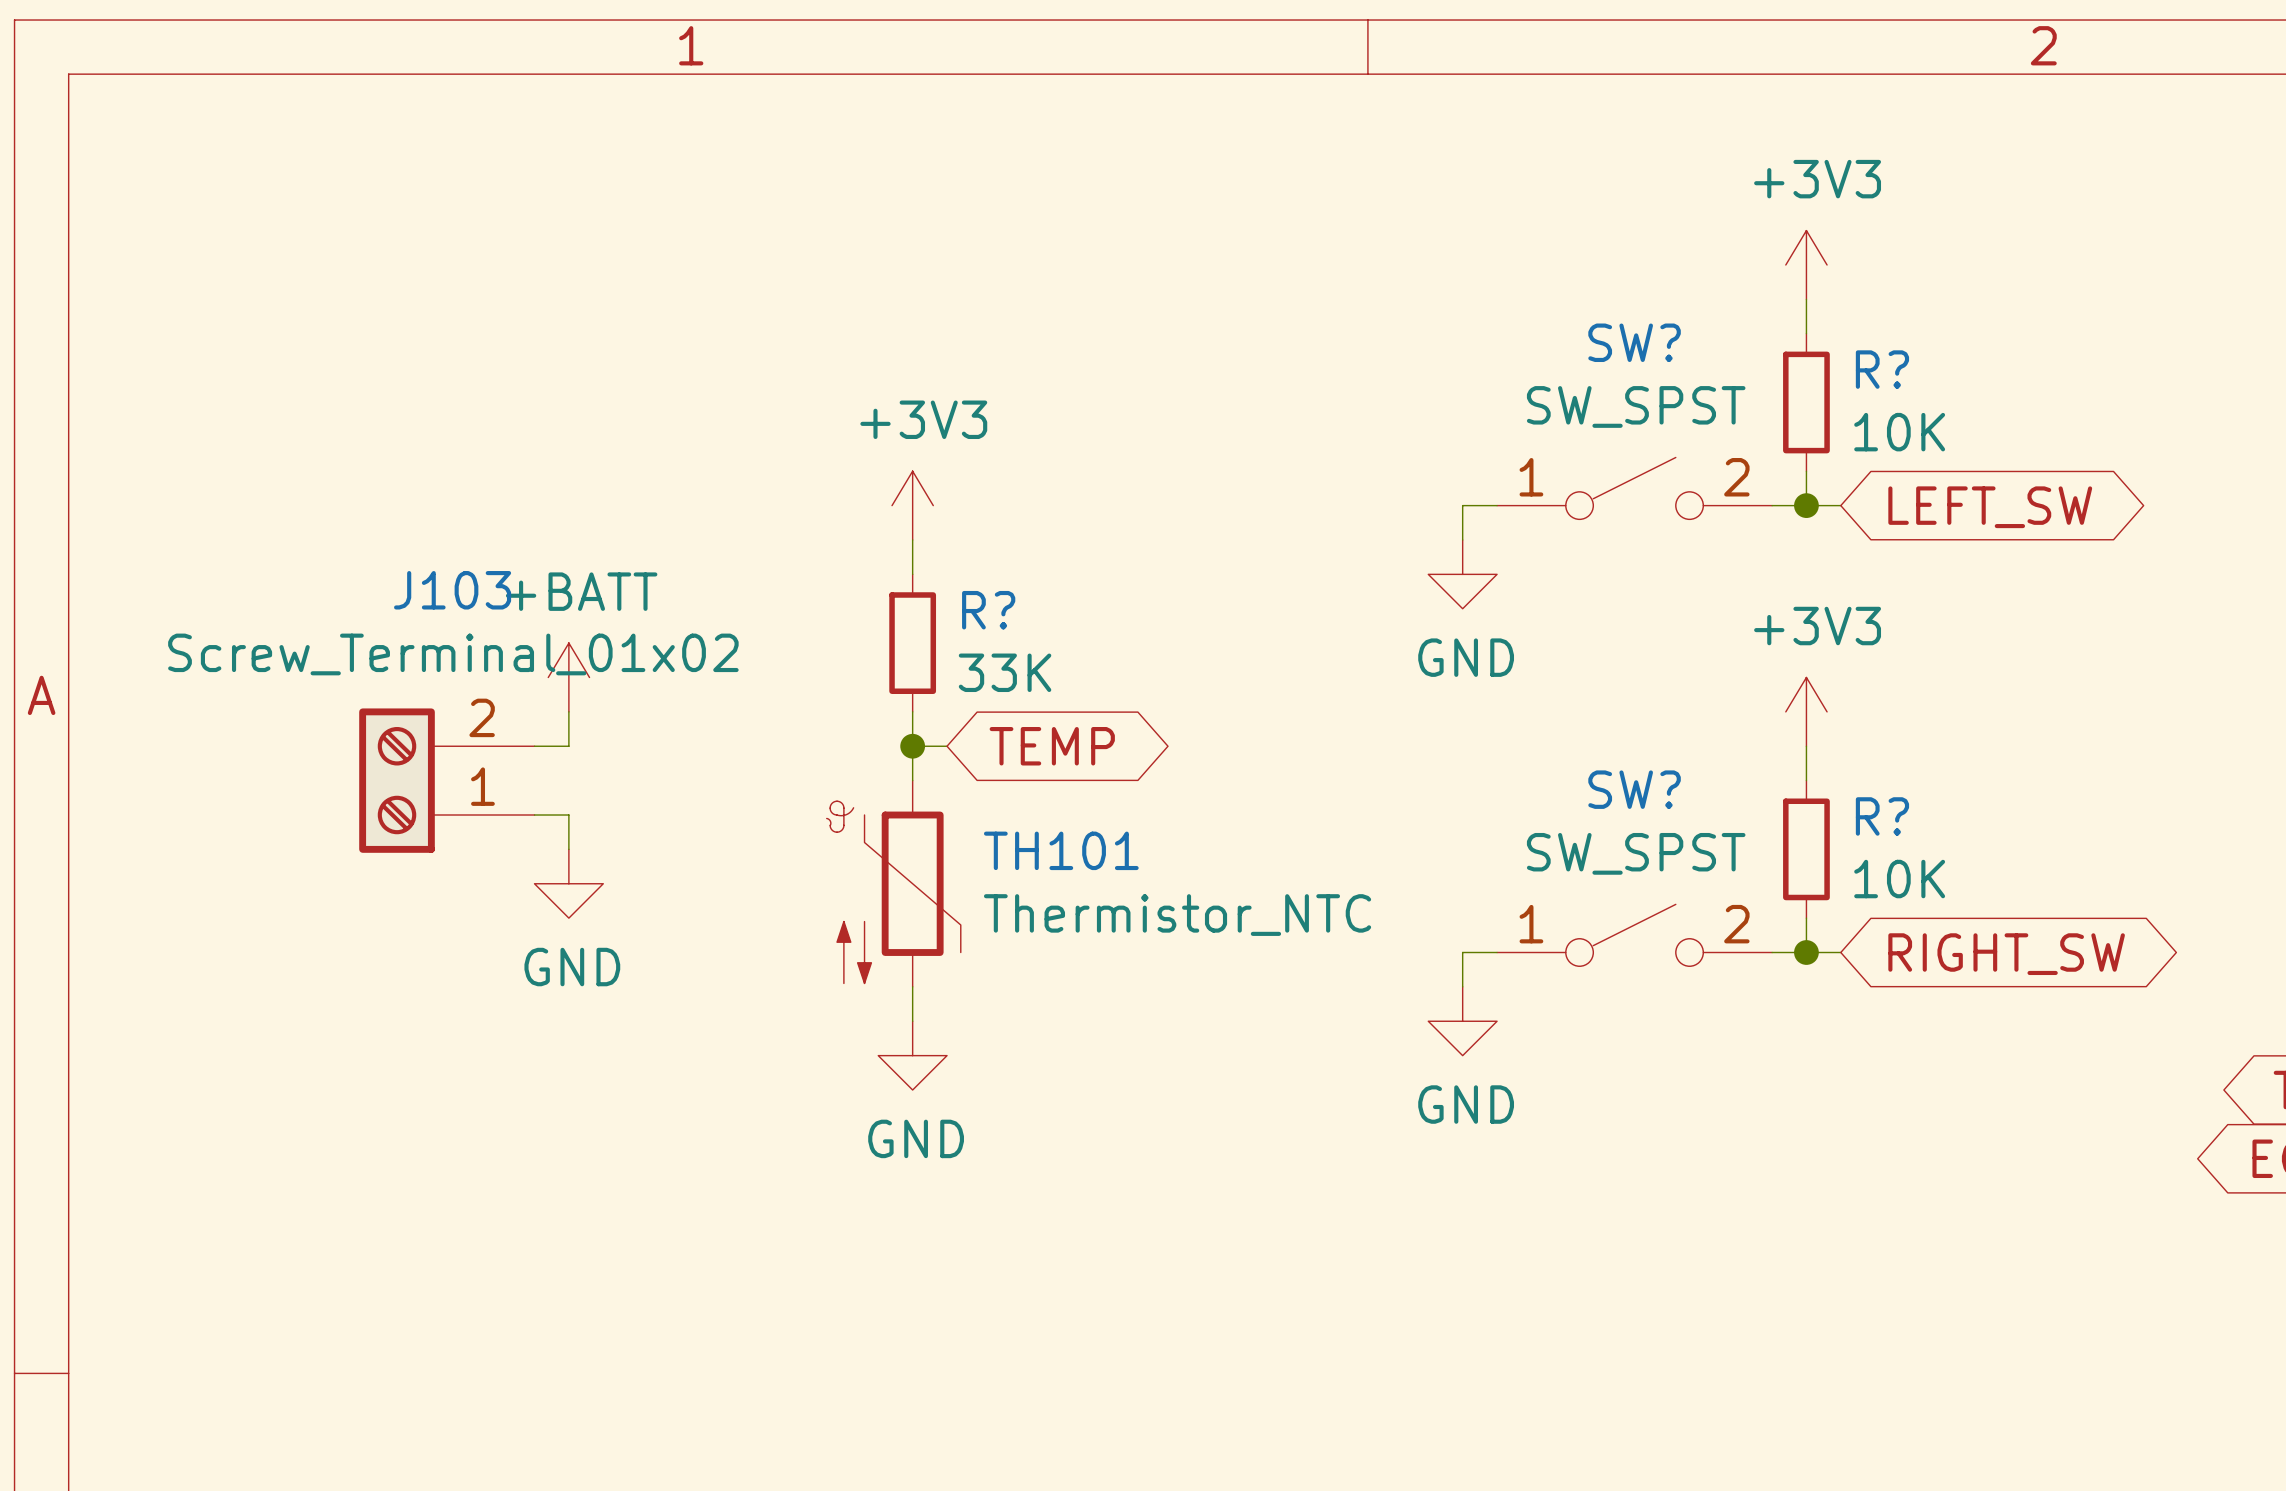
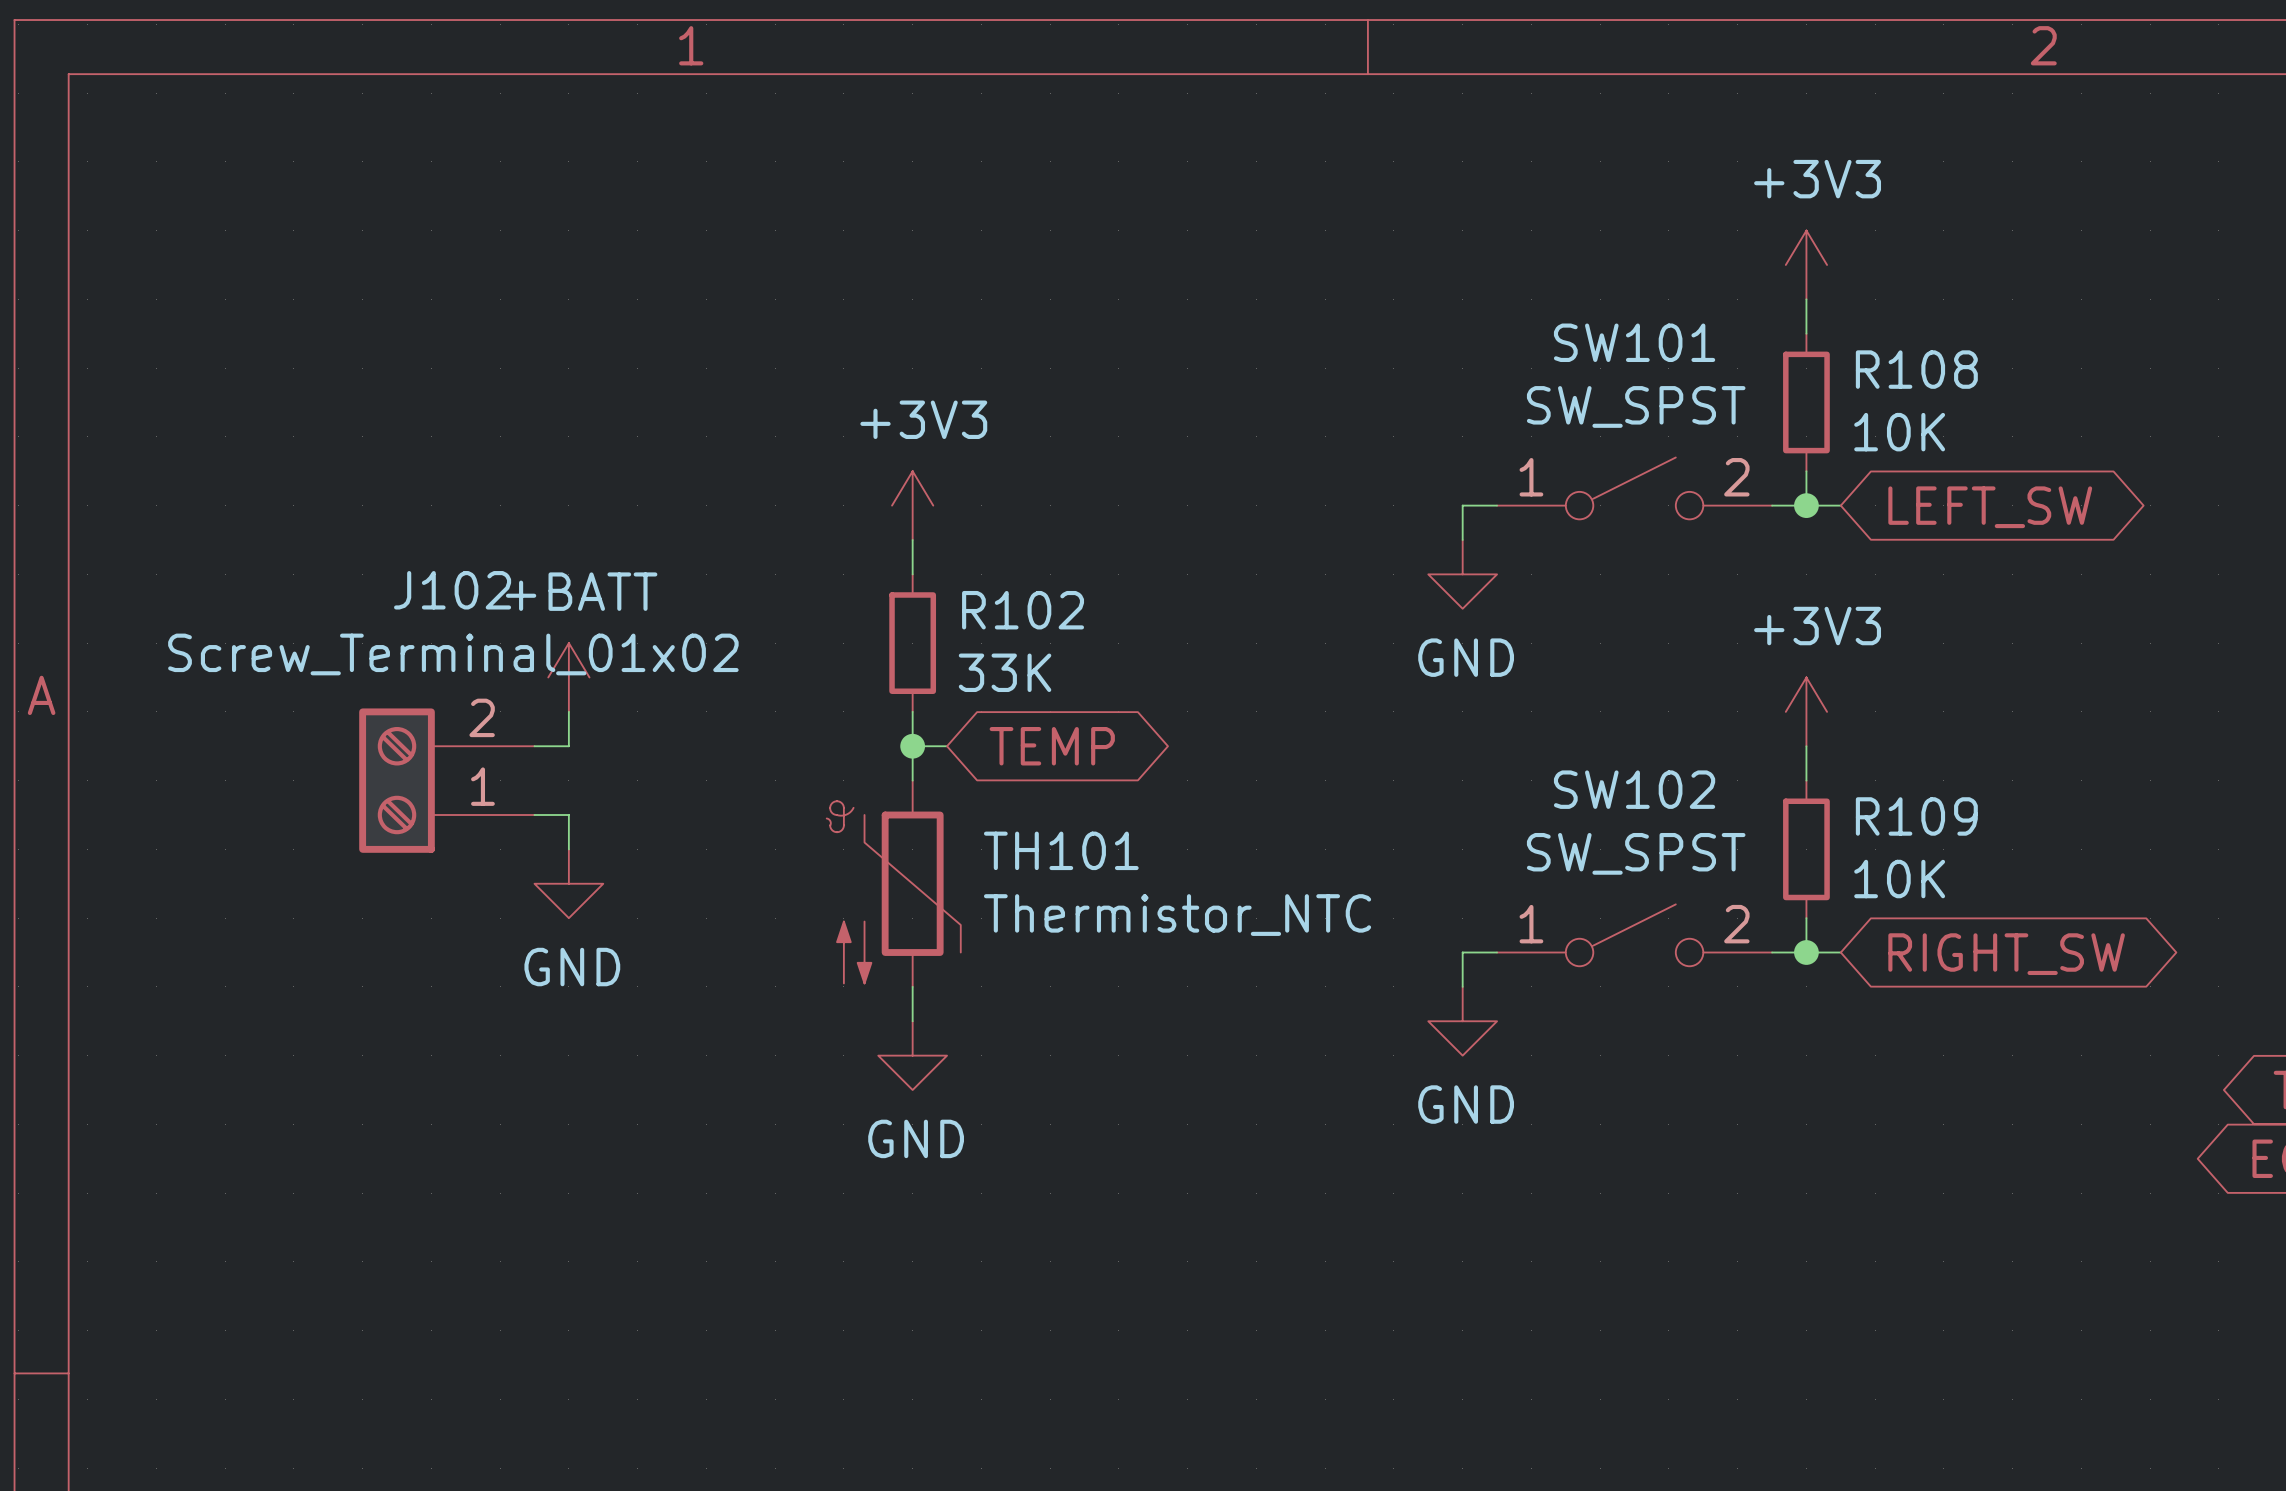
SW? name: SW? (1634, 342) -> SW101 (1634, 342)
R? name: R? (1882, 369) -> R108 (1916, 369)
J103 name: J103 (452, 590) -> J102 (452, 590)
R? name: R? (988, 610) -> R102 (1023, 610)
SW? name: SW? (1634, 789) -> SW102 (1634, 789)
R? name: R? (1882, 816) -> R109 (1916, 816)

